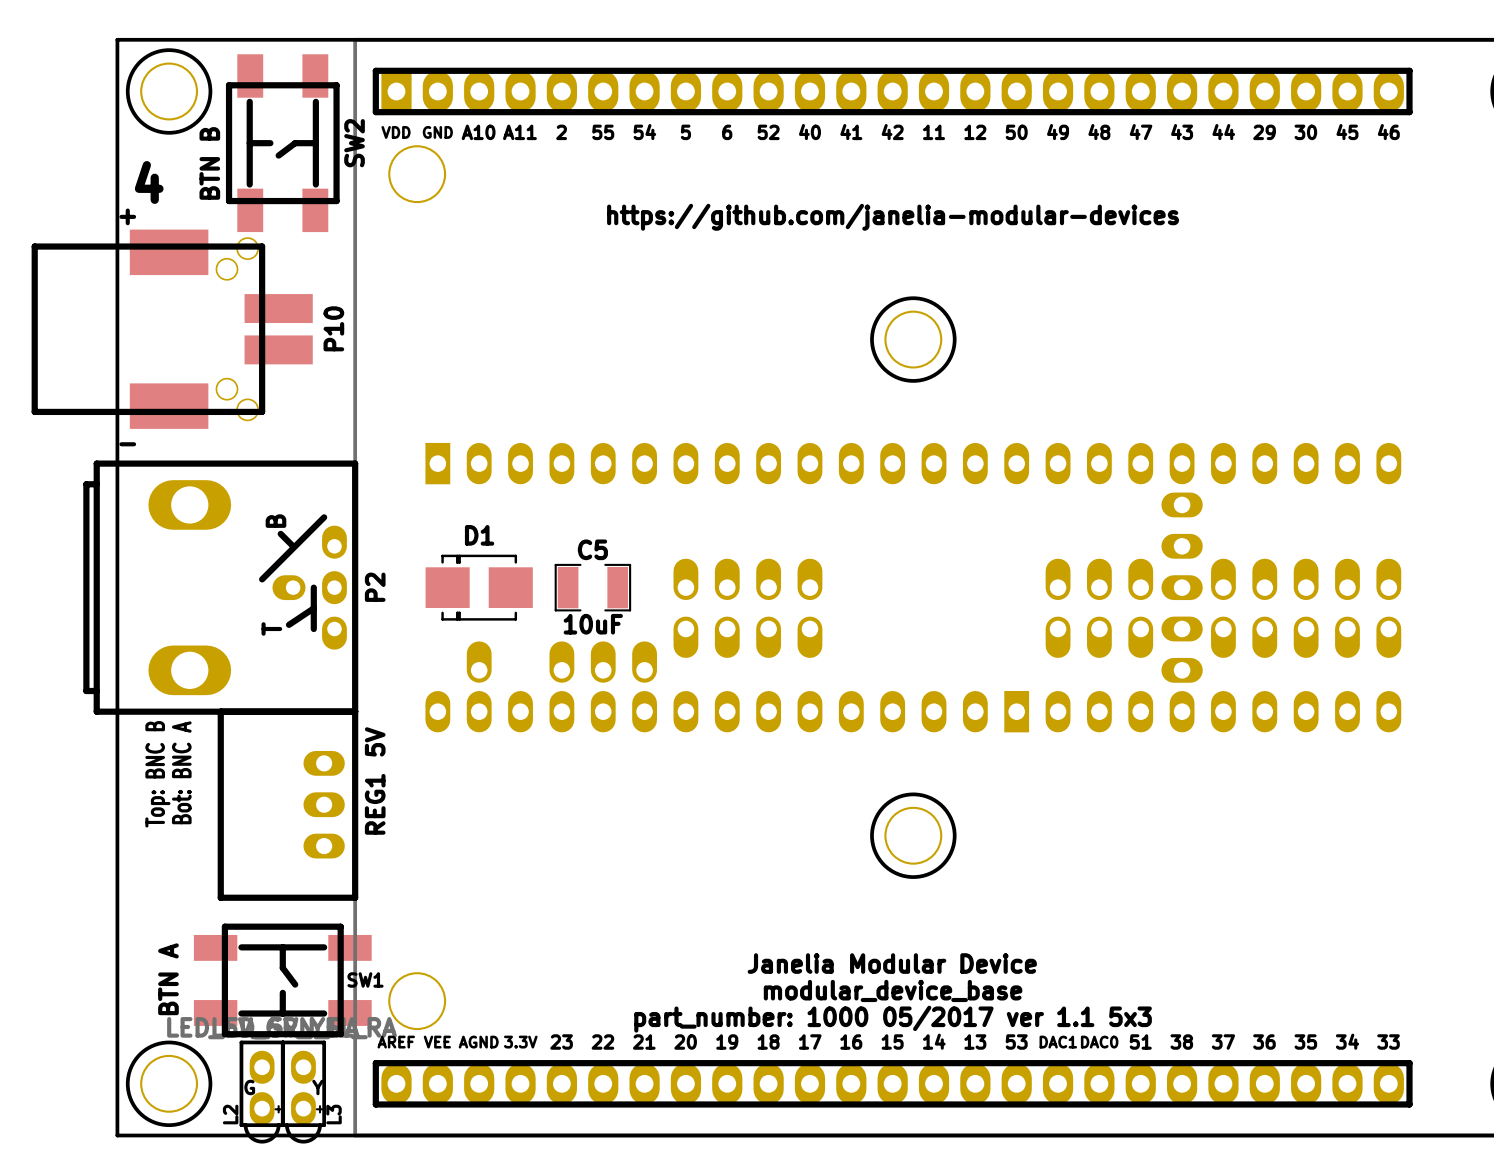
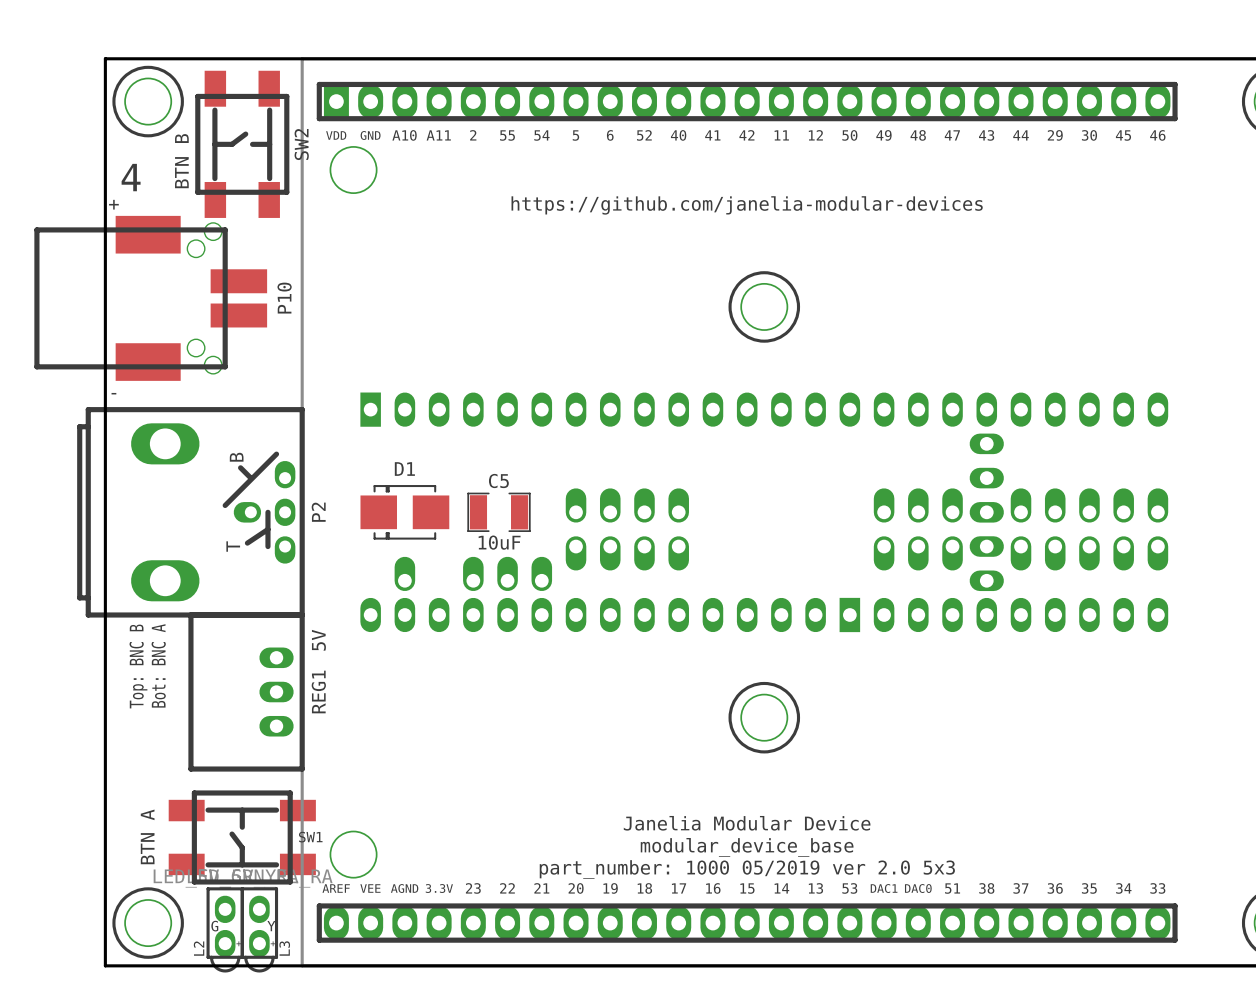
SW2 footprint: [225, 54, 340, 233] -> [195, 70, 290, 218]
SW1 footprint: [193, 923, 372, 1038] -> [168, 790, 316, 885]
text: part_number: 1000 05/2017 ver 1.1 5x3 (893, 1019) -> part_number: 1000 05/2019 ver 2.0 5x3 (747, 869)

